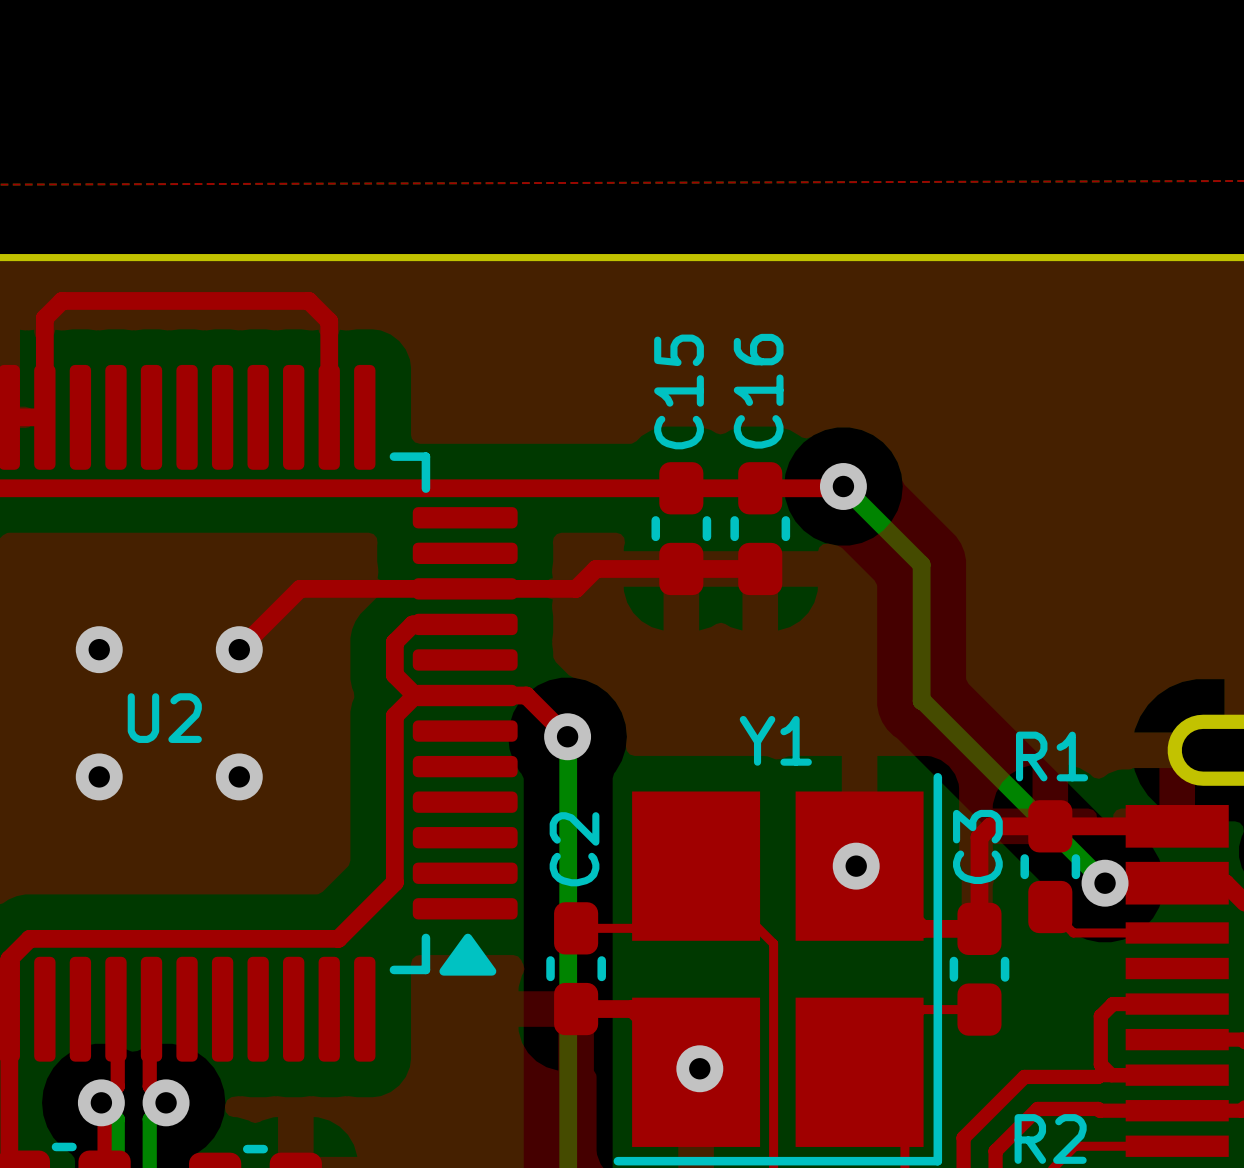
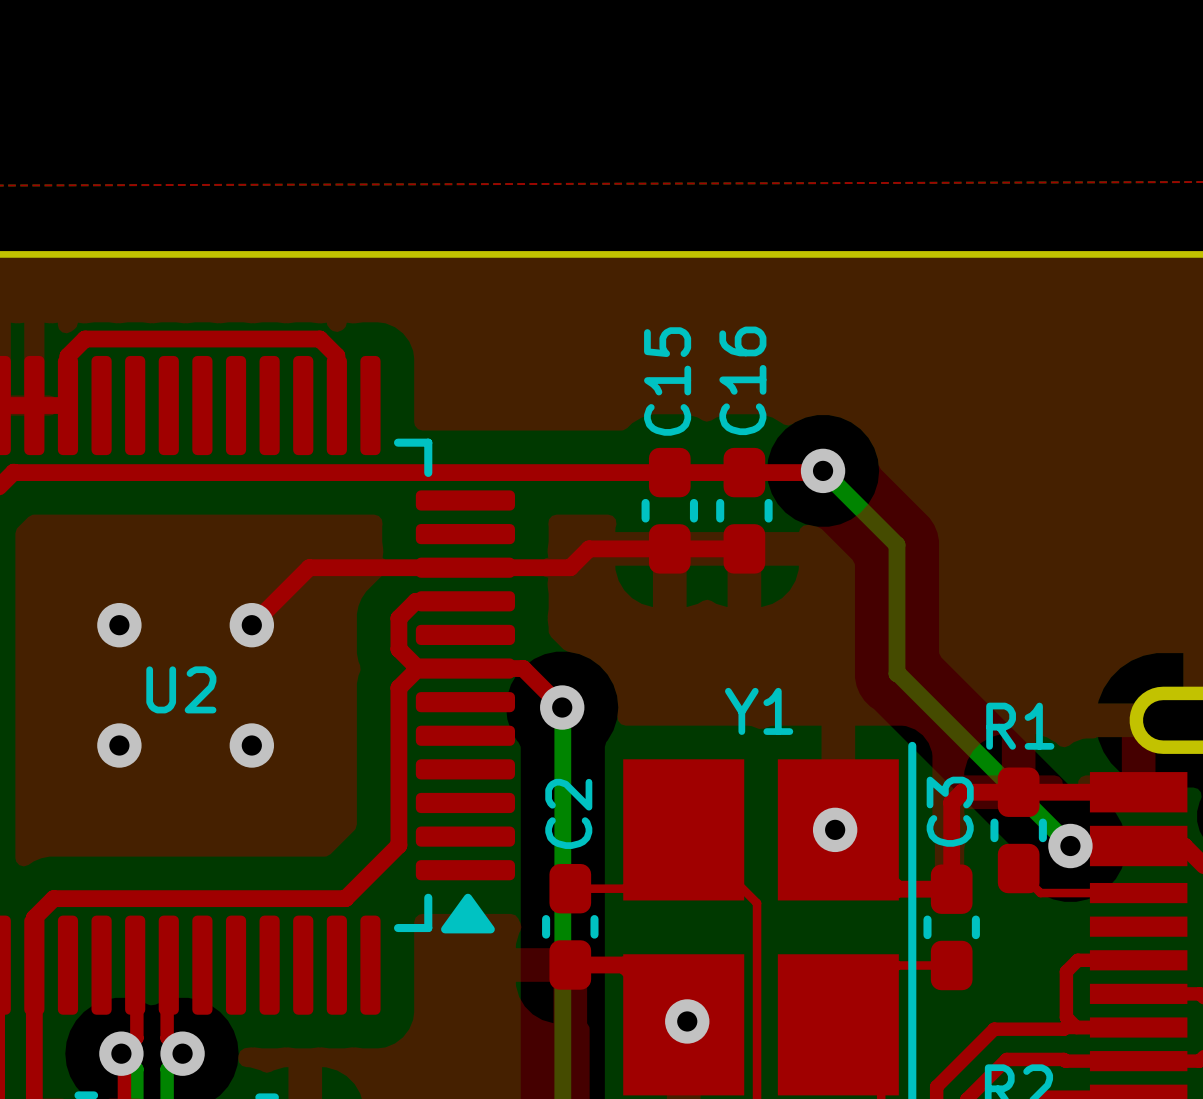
top track: (44, 365) (44, 318) (62, 300) (308, 300) (329, 321) (329, 364) -> (67, 356) (85, 339) (319, 339) (336, 355)

